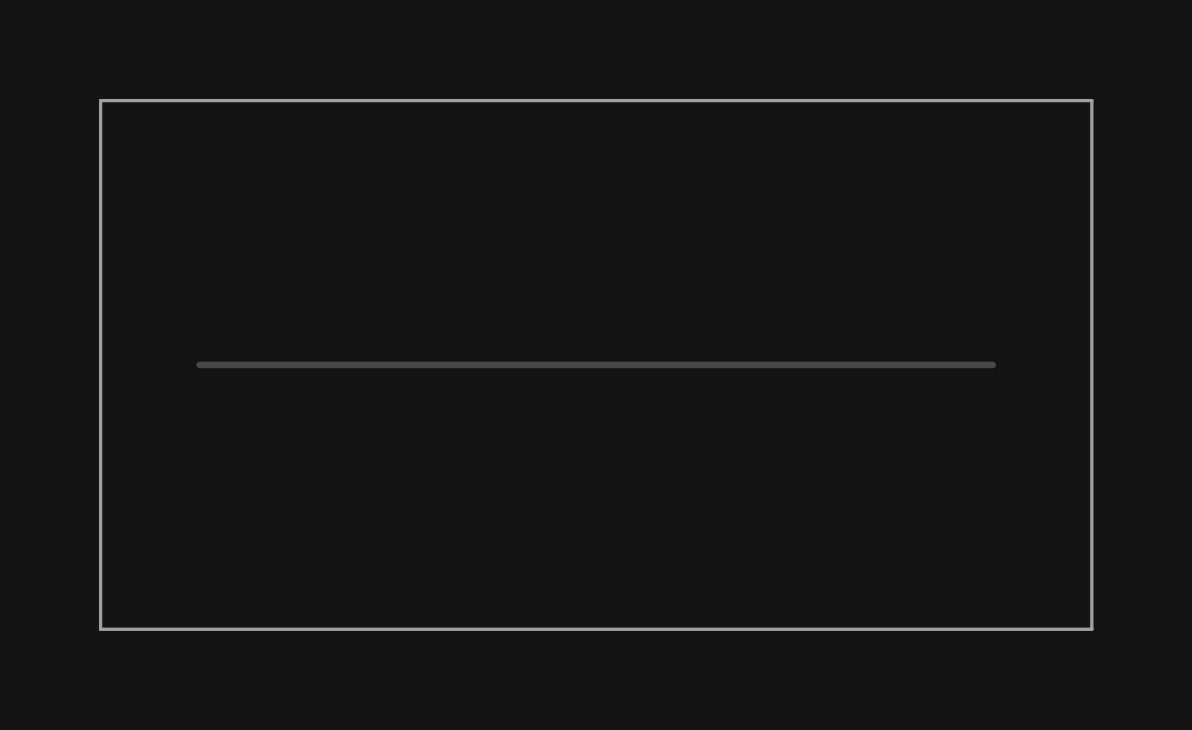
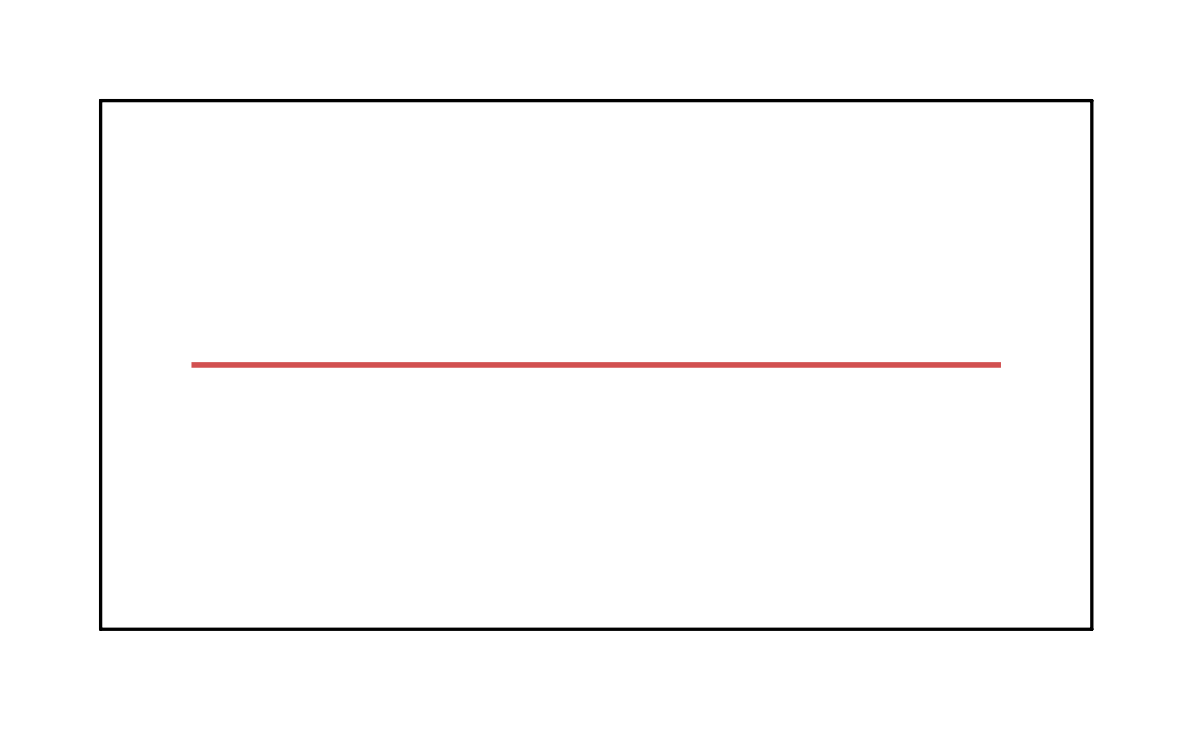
drawing: none -> [191, 362, 1001, 368]
track: (199, 364) (992, 364) -> none

